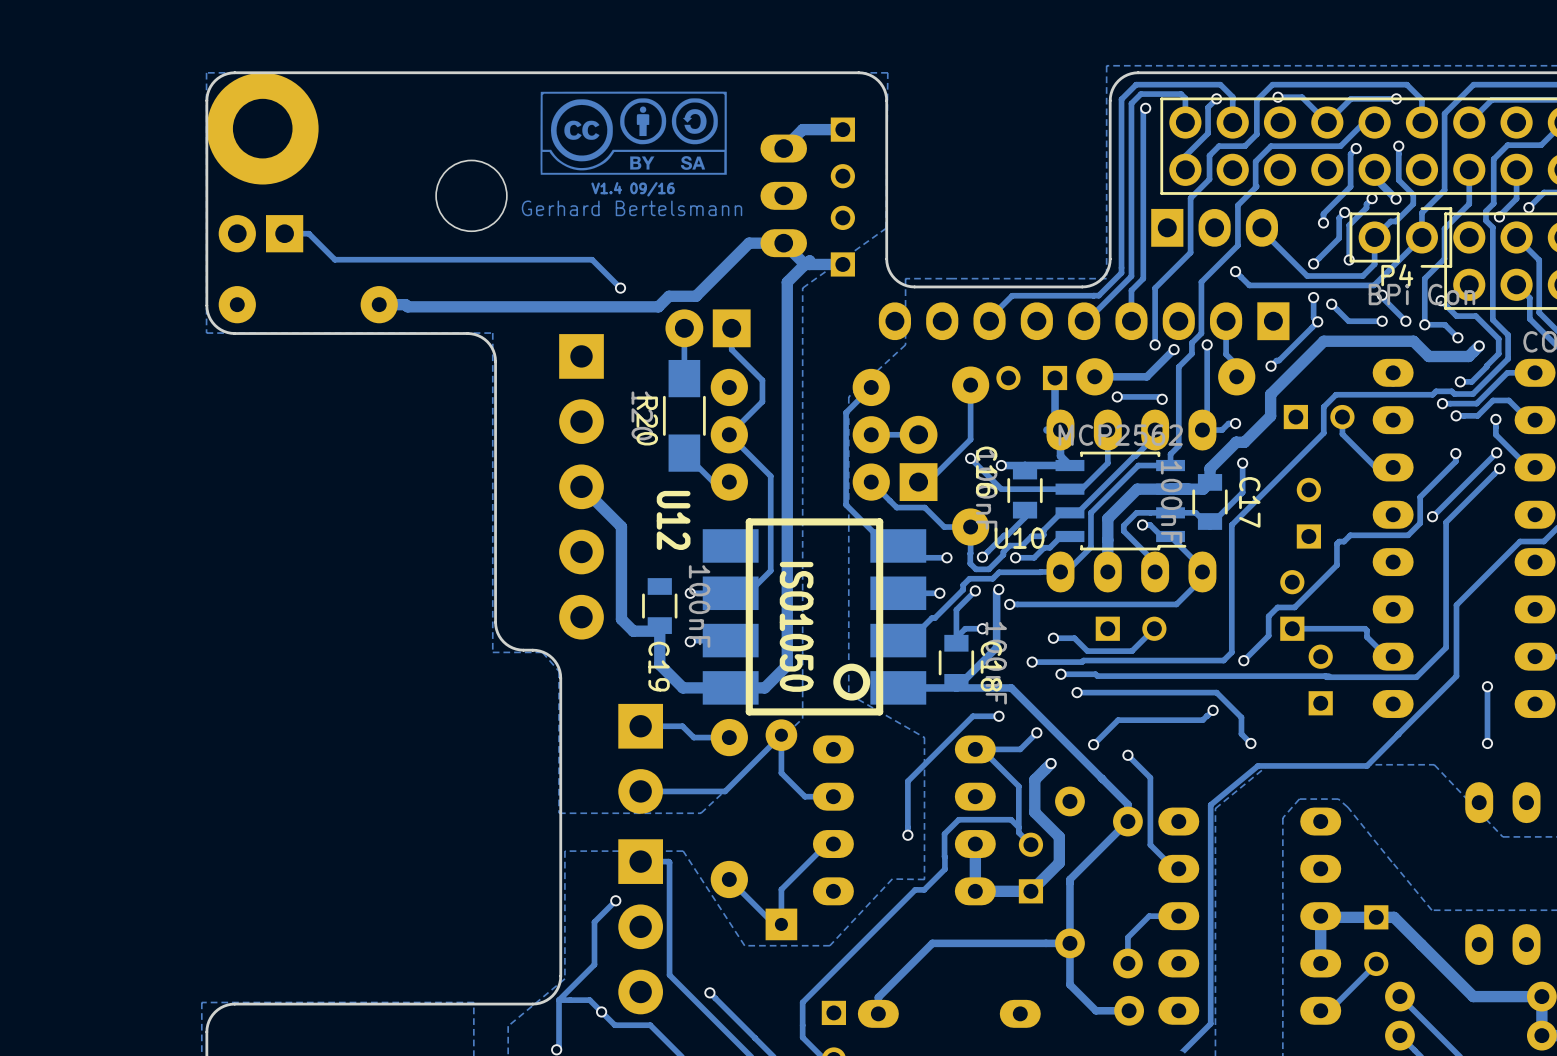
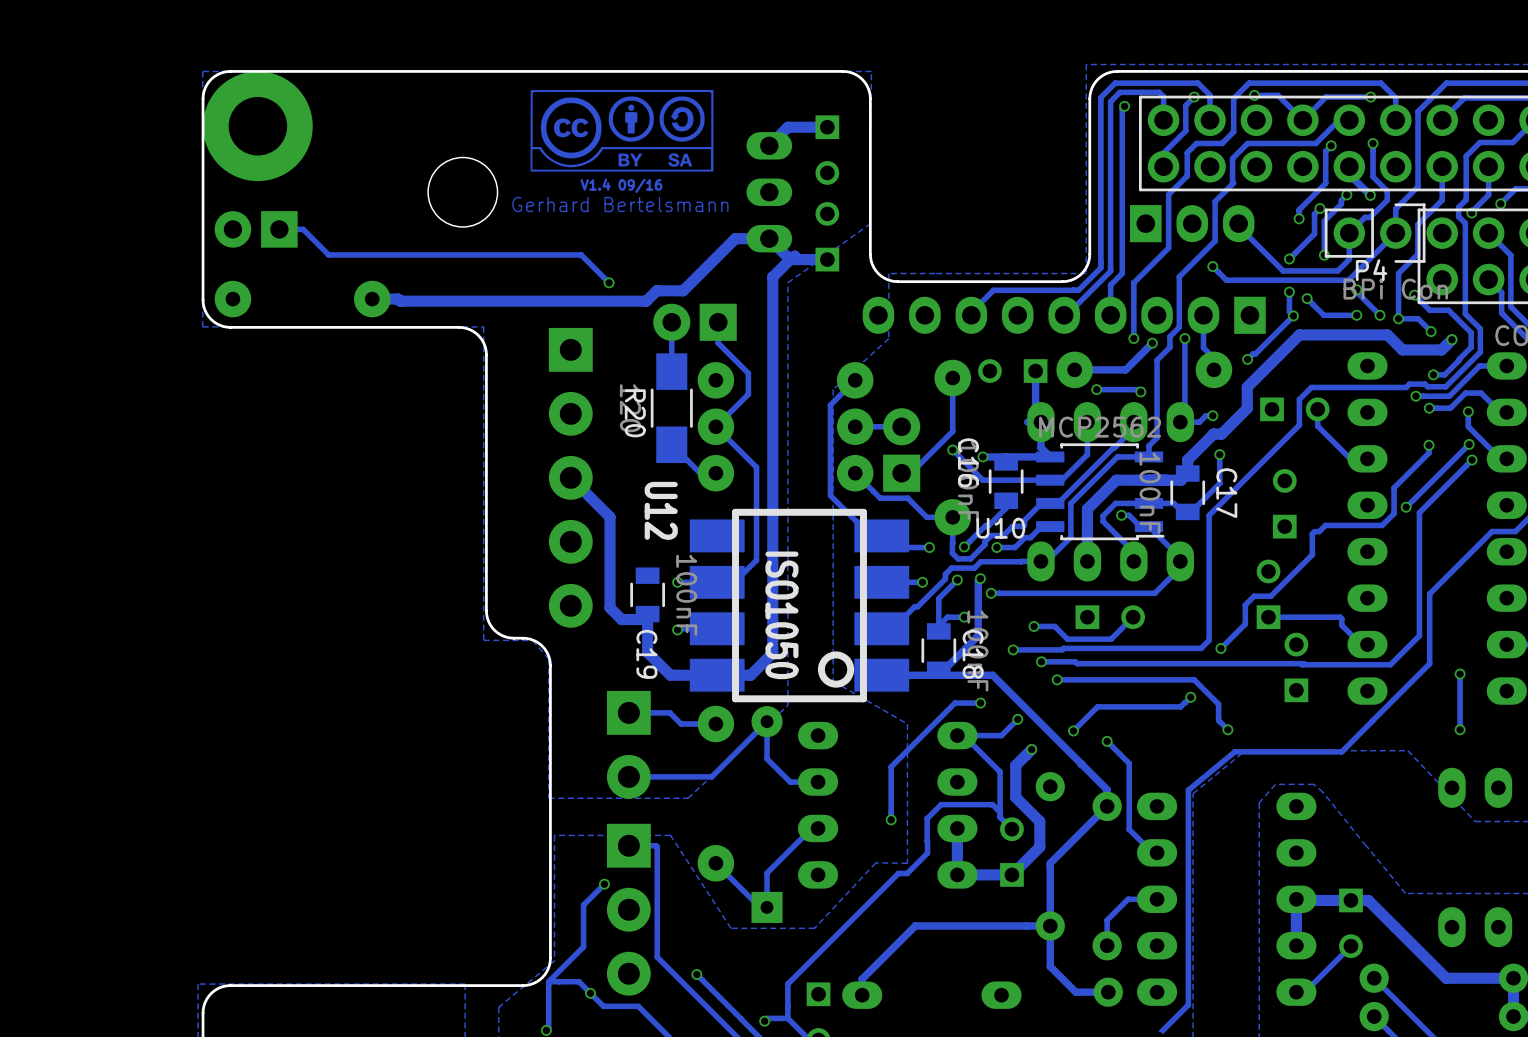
track: none -> (787, 1018) (767, 1018) (764, 1021)
via: none -> (764, 1021)

